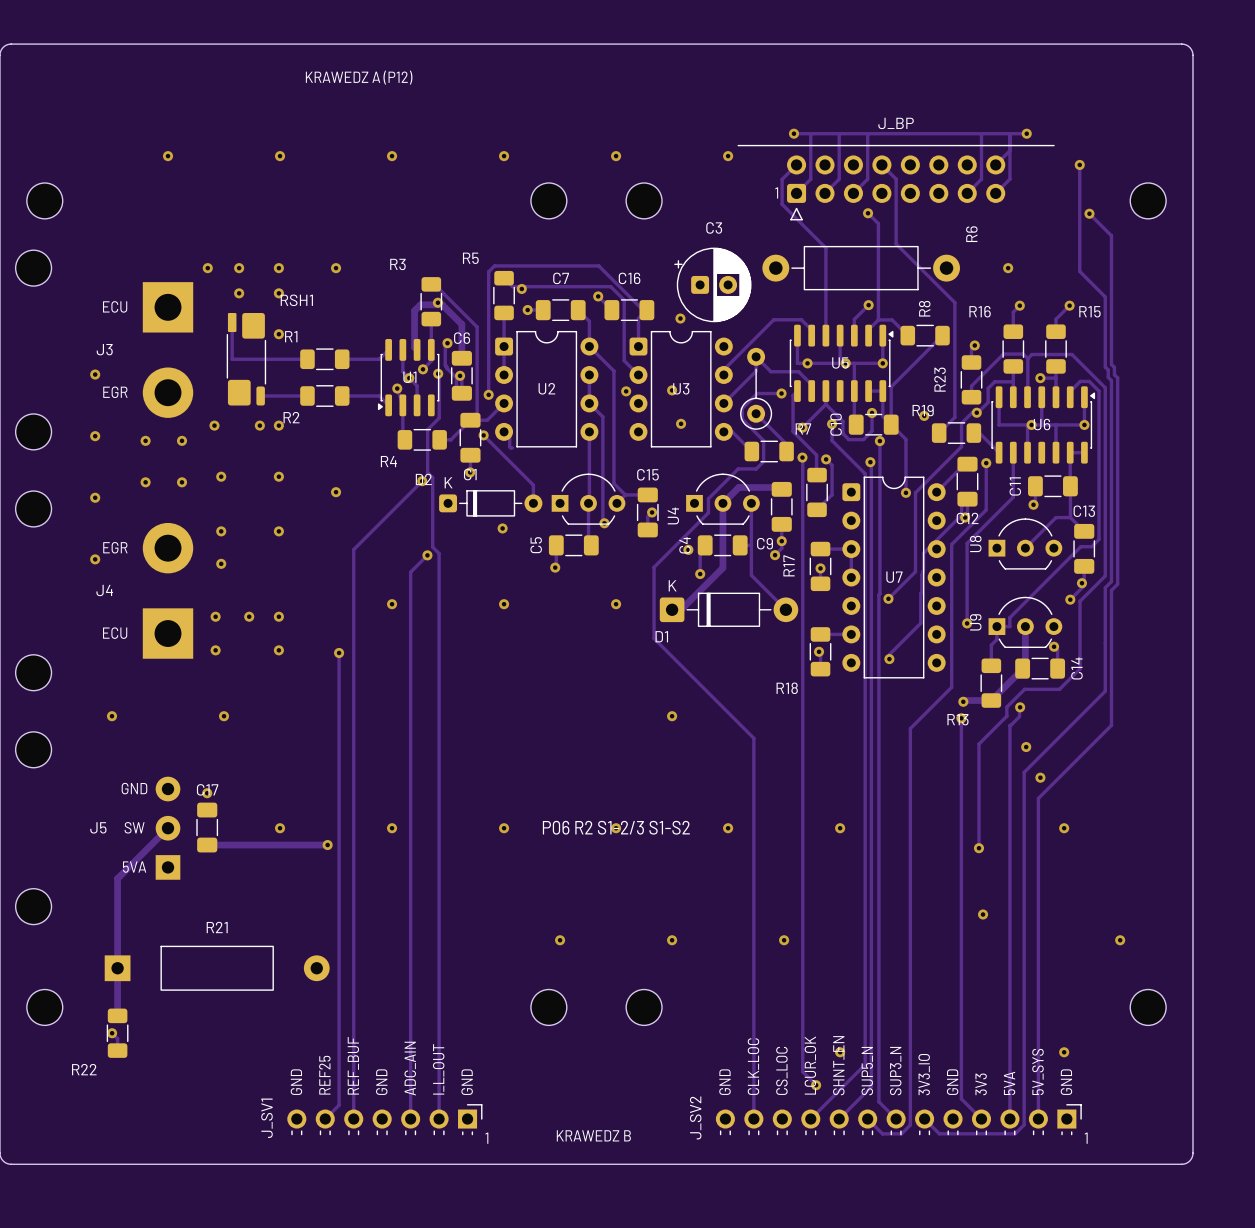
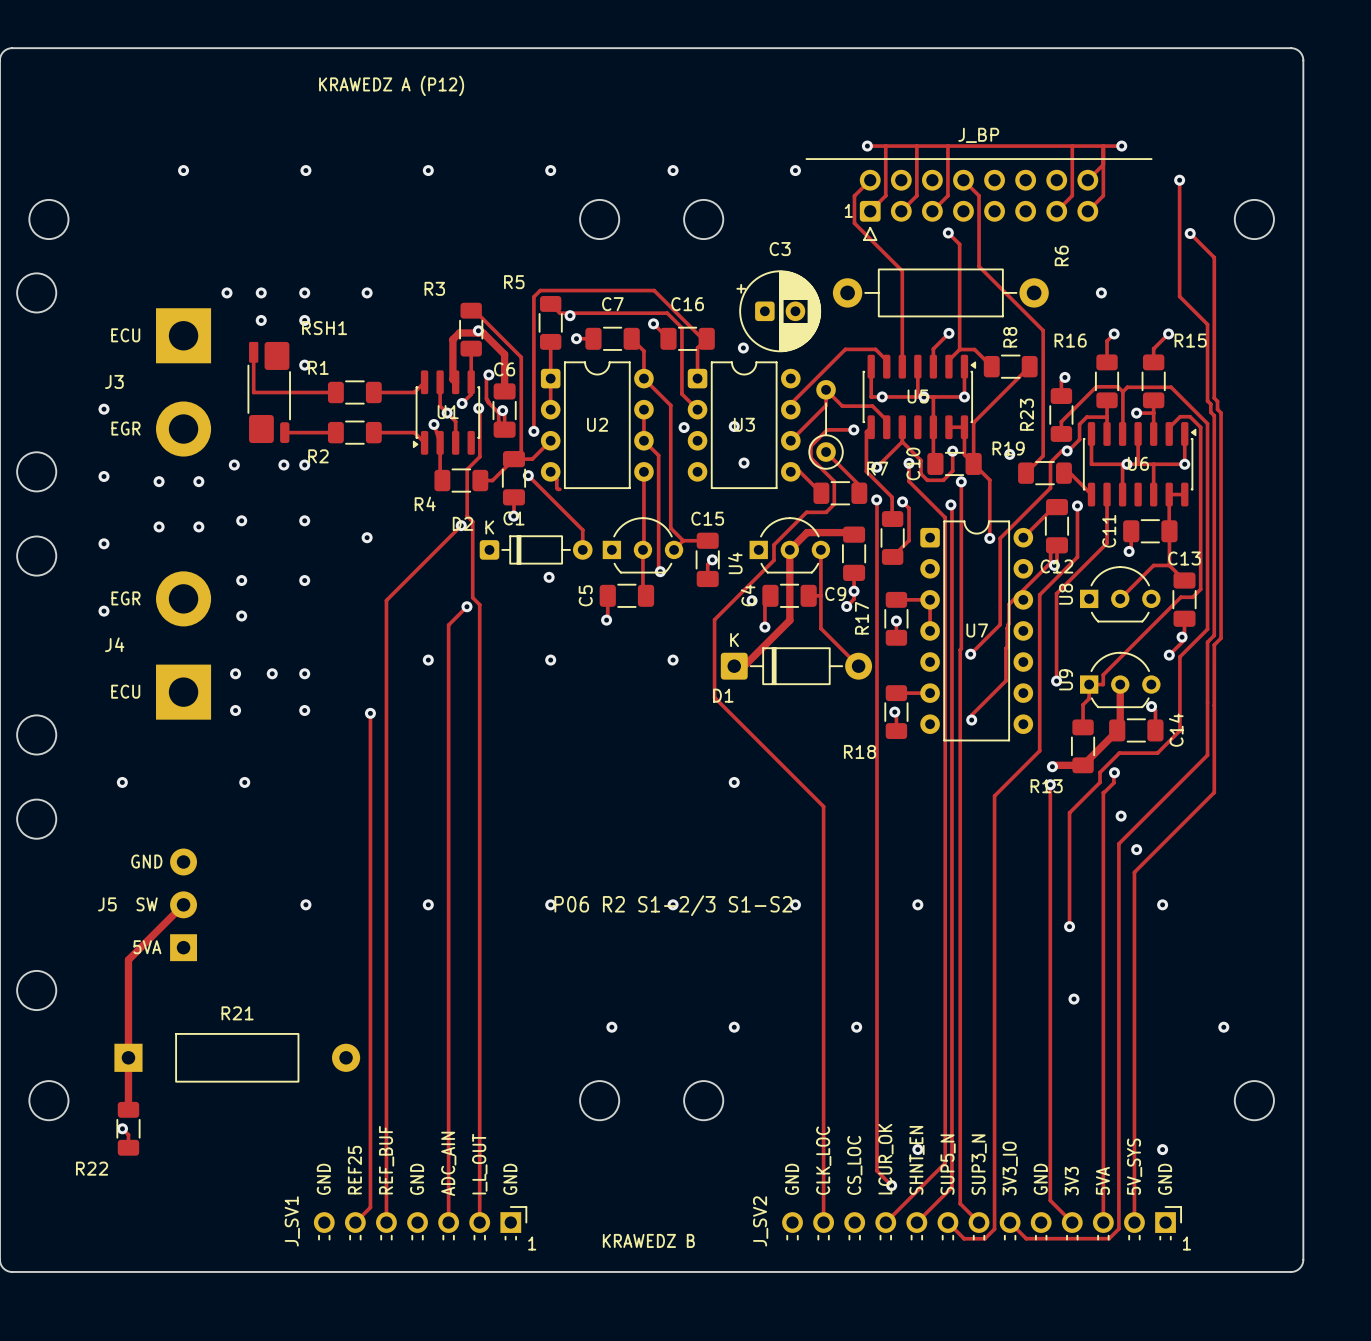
via: (207, 793) -> none
C17: (207, 827) -> none
track: (207, 845) (327, 845) -> none
via: (327, 845) -> none

